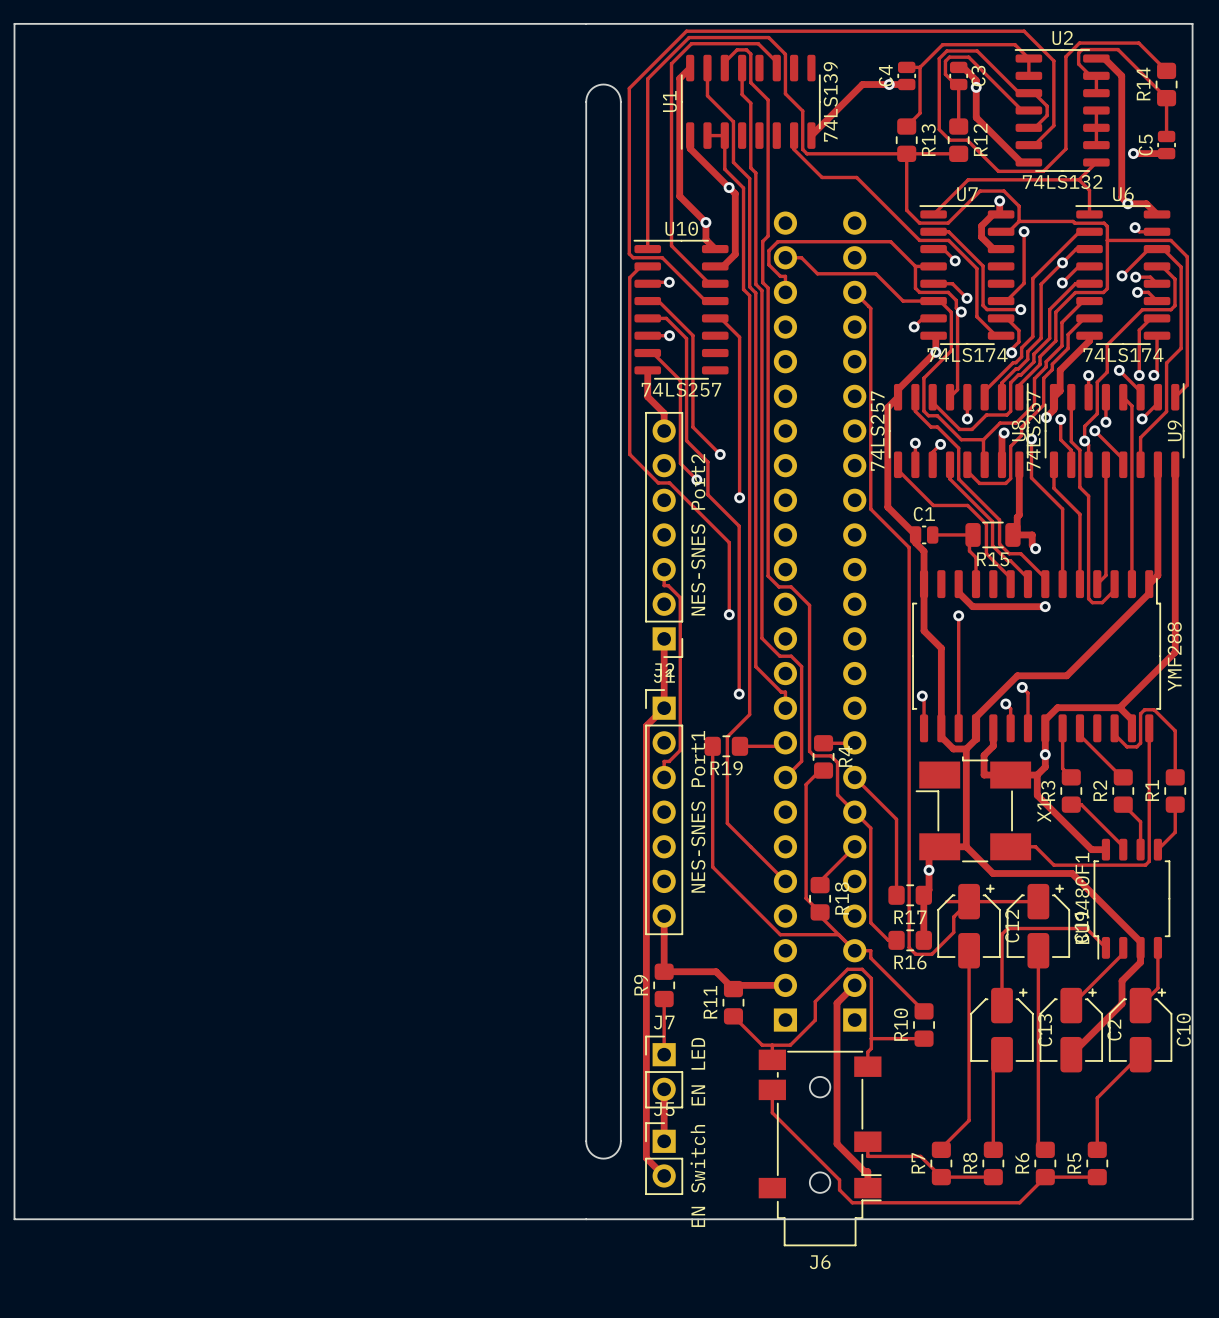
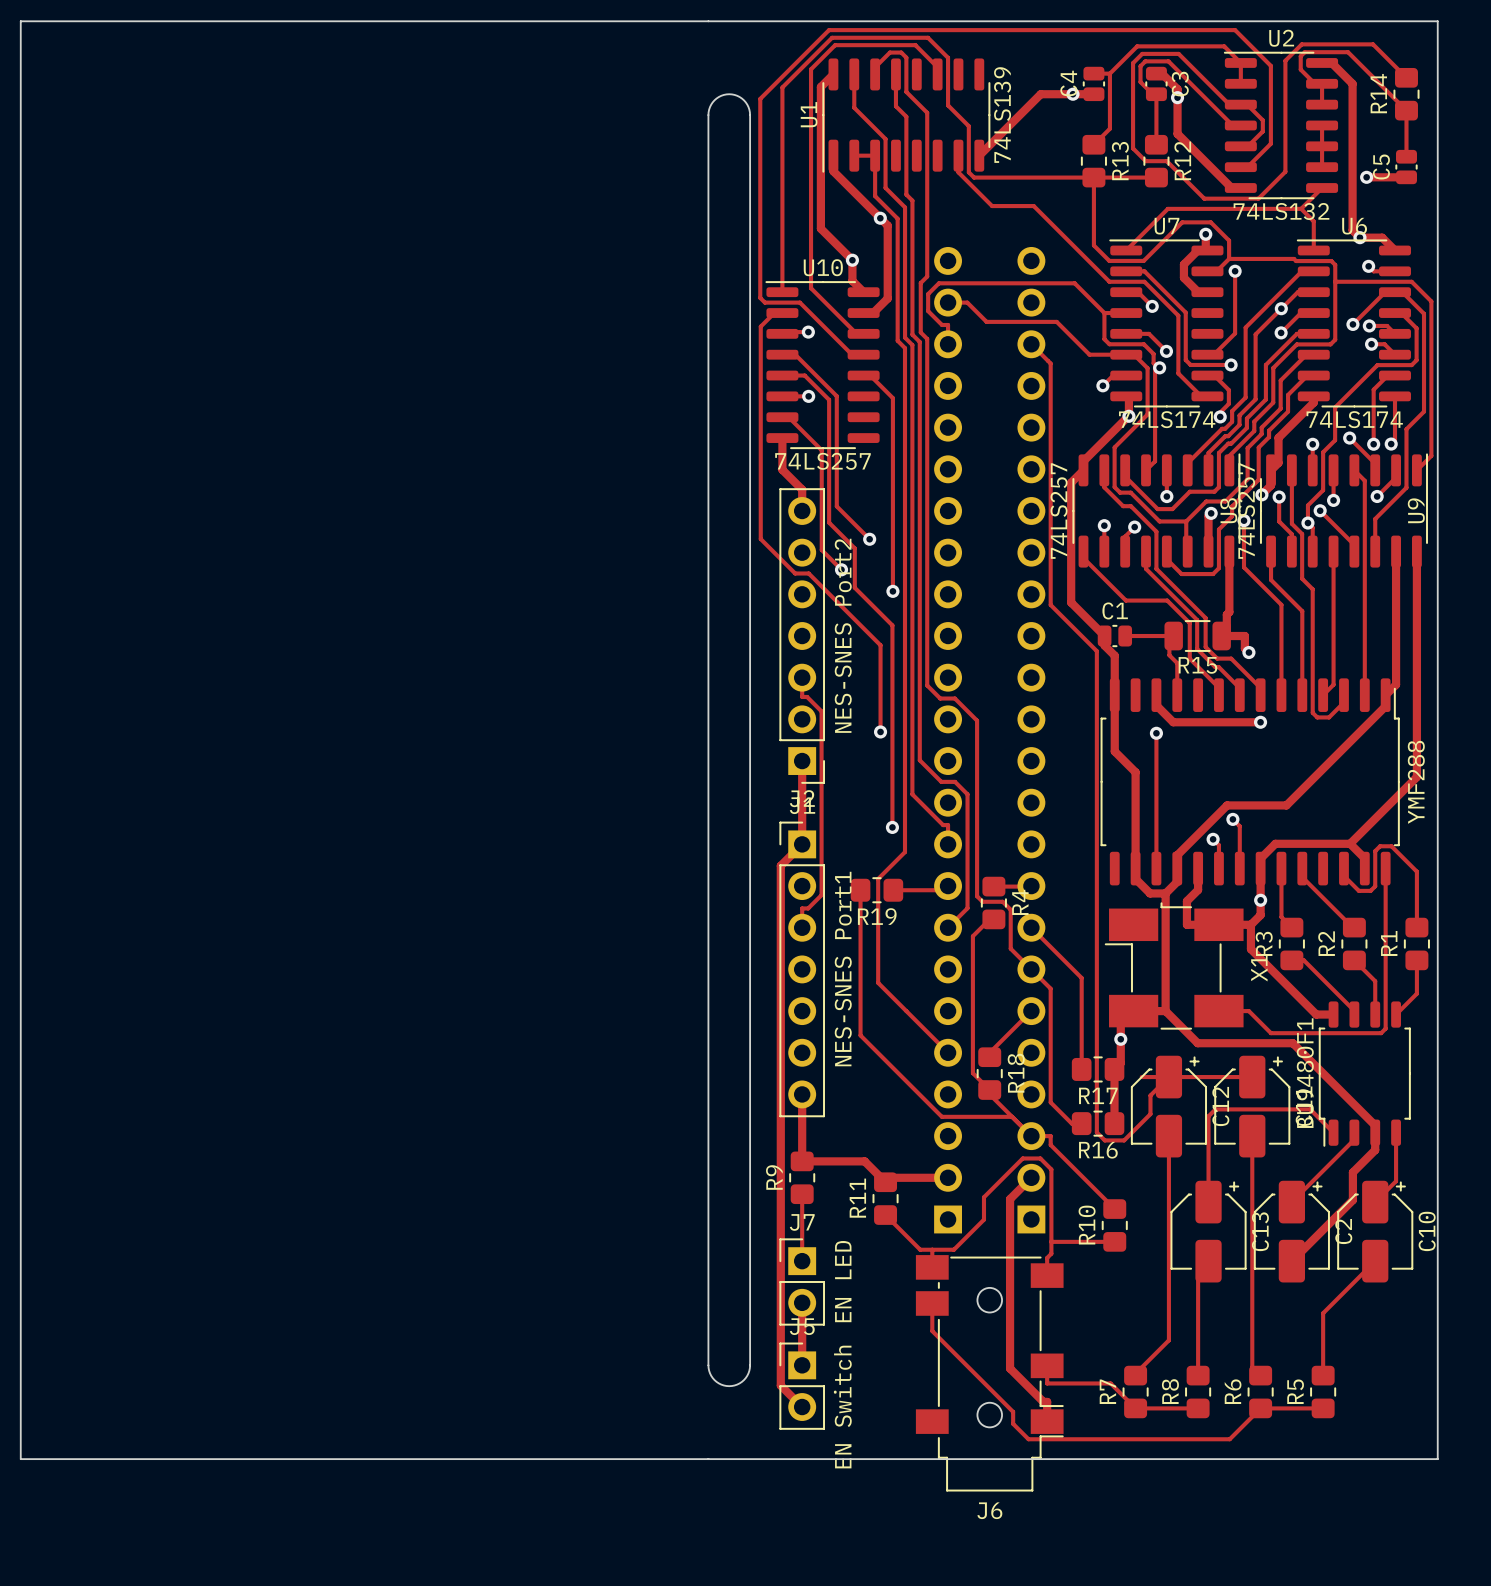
track: (922, 696) (924, 697) (924, 728) -> none
via: (922, 696) -> none

